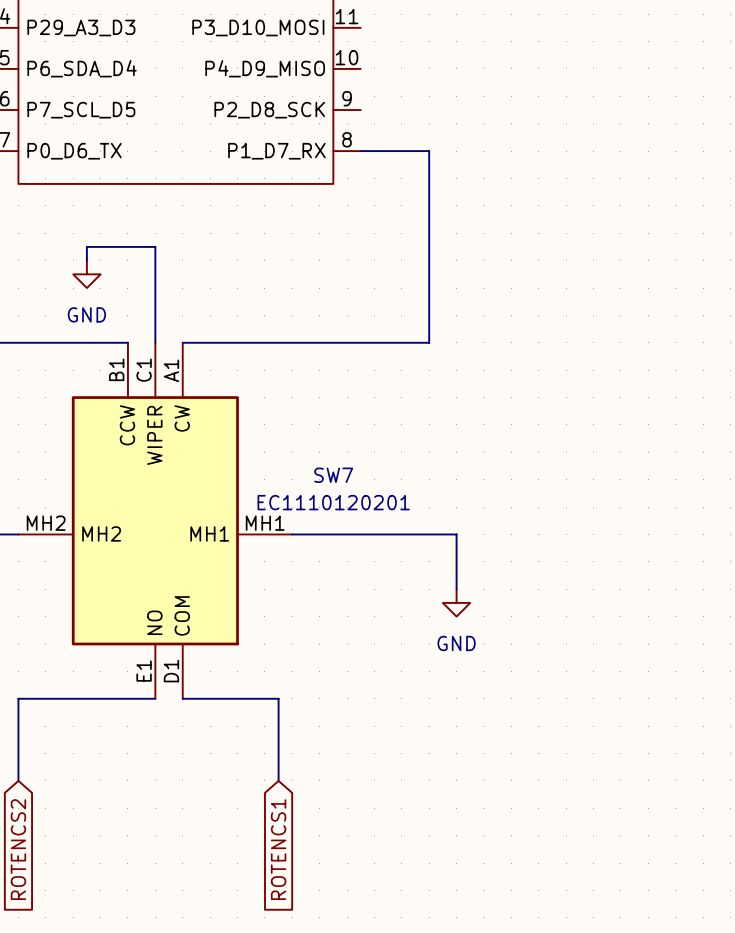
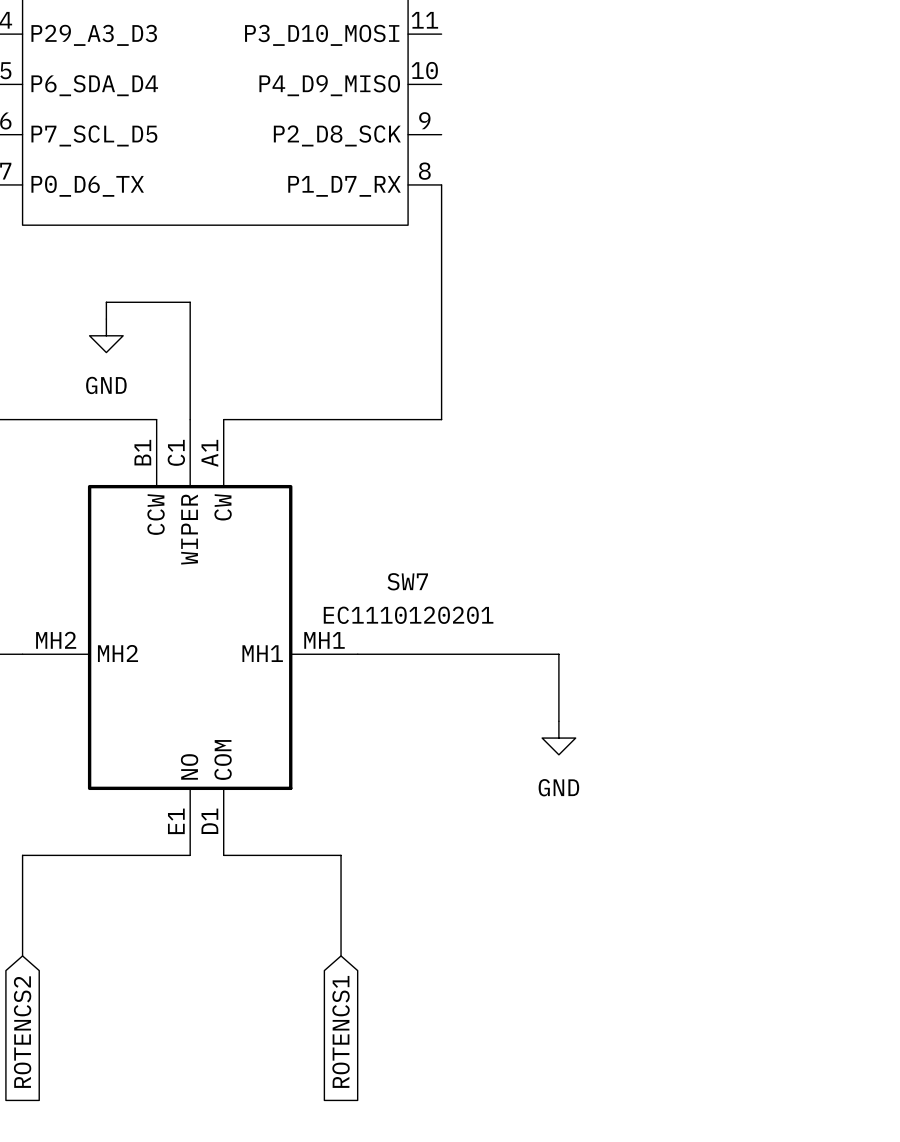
wire: (360, 151) (429, 151) (429, 342) (360, 342) -> (441, 184) (441, 419)

